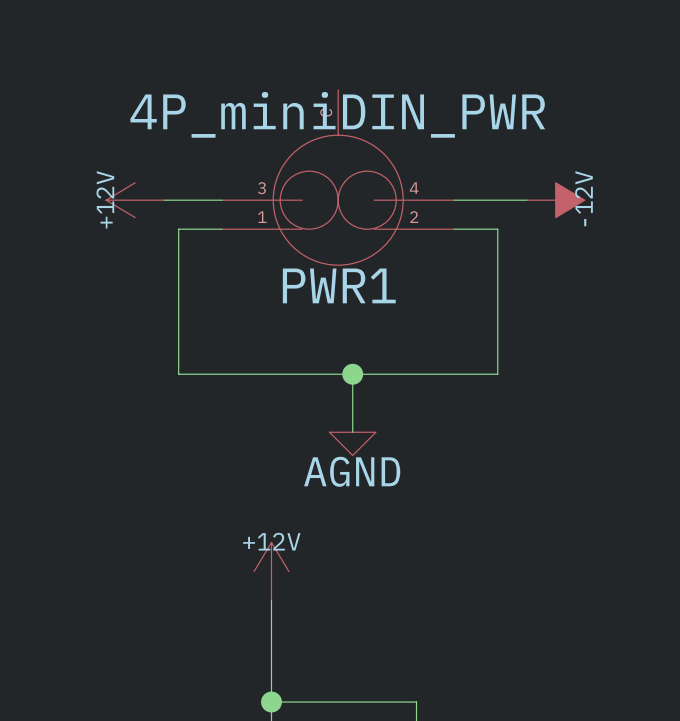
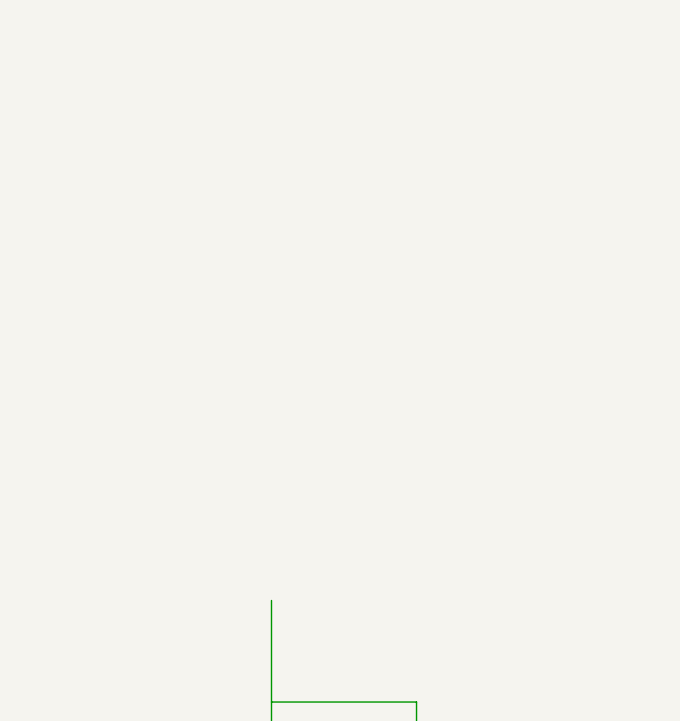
PWR1: 4P_miniDIN_PWR (338, 177) -> none
power symbol: +12V (135, 200) -> none
wire: (164, 200) (222, 200) -> none
wire: (454, 200) (526, 200) -> none
power symbol: -12V (555, 200) -> none
wire: (222, 229) (178, 229) (178, 374) (497, 374) (497, 229) (454, 229) -> none
wire: (352, 374) (352, 432) -> none
junction: (352, 374) -> none
power symbol: AGND (352, 443) -> none
power symbol: +12V (271, 571) -> none
junction: (271, 702) -> none

